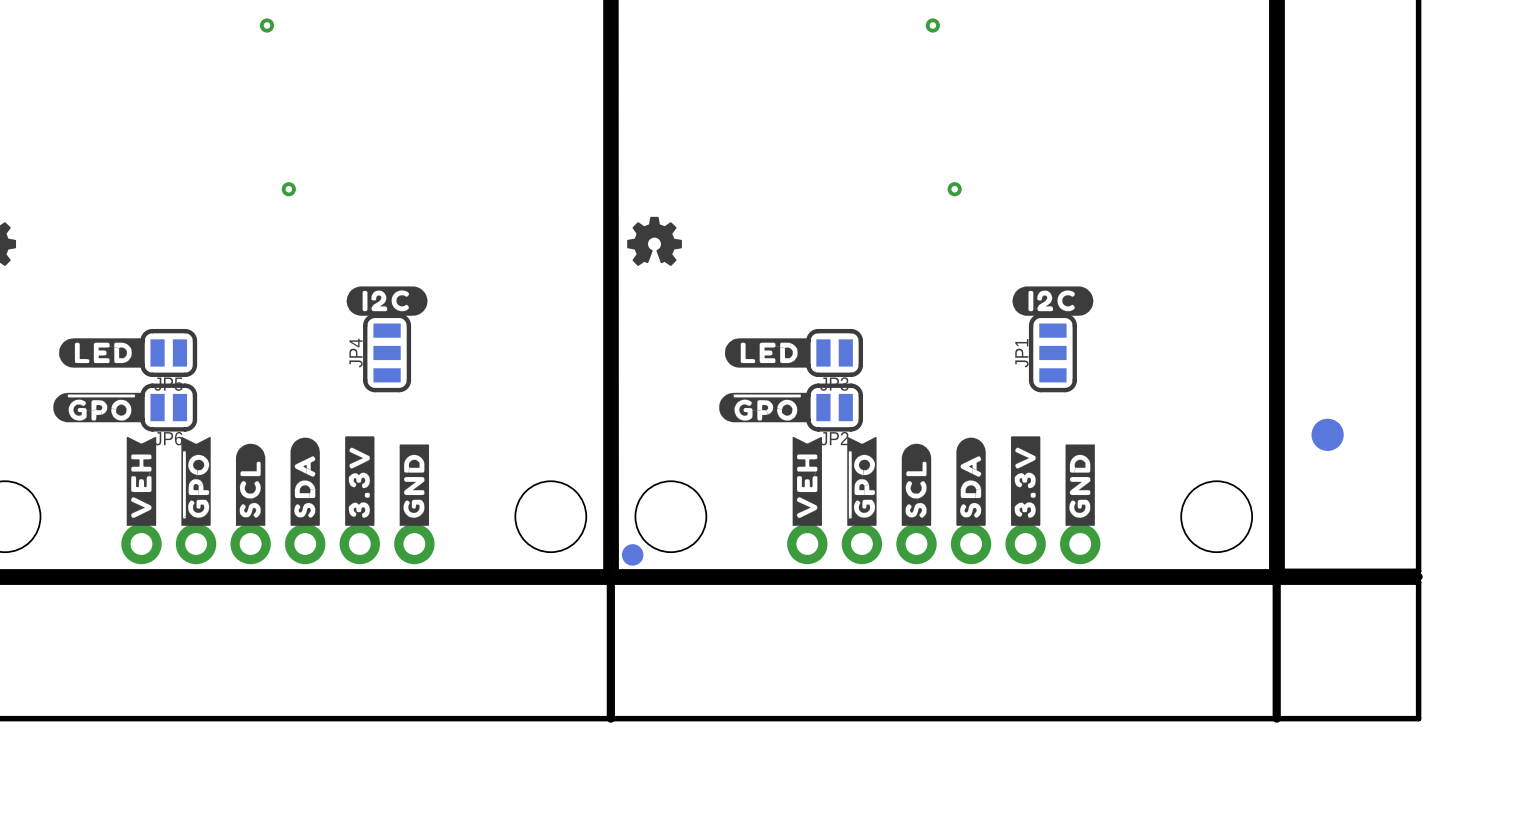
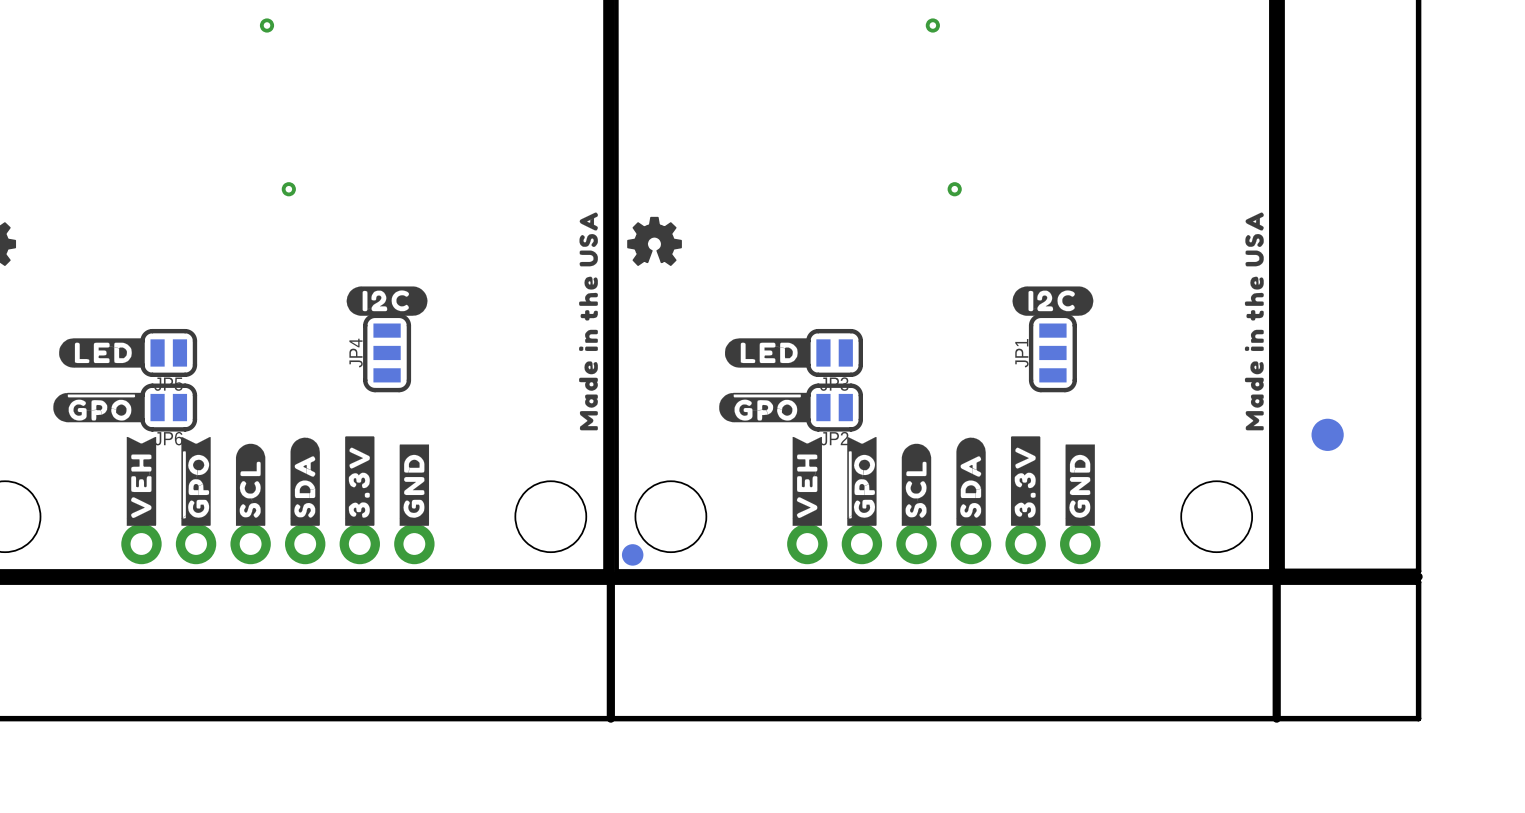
drawing: none -> [579, 212, 598, 431]
drawing: none -> [1244, 212, 1264, 431]

